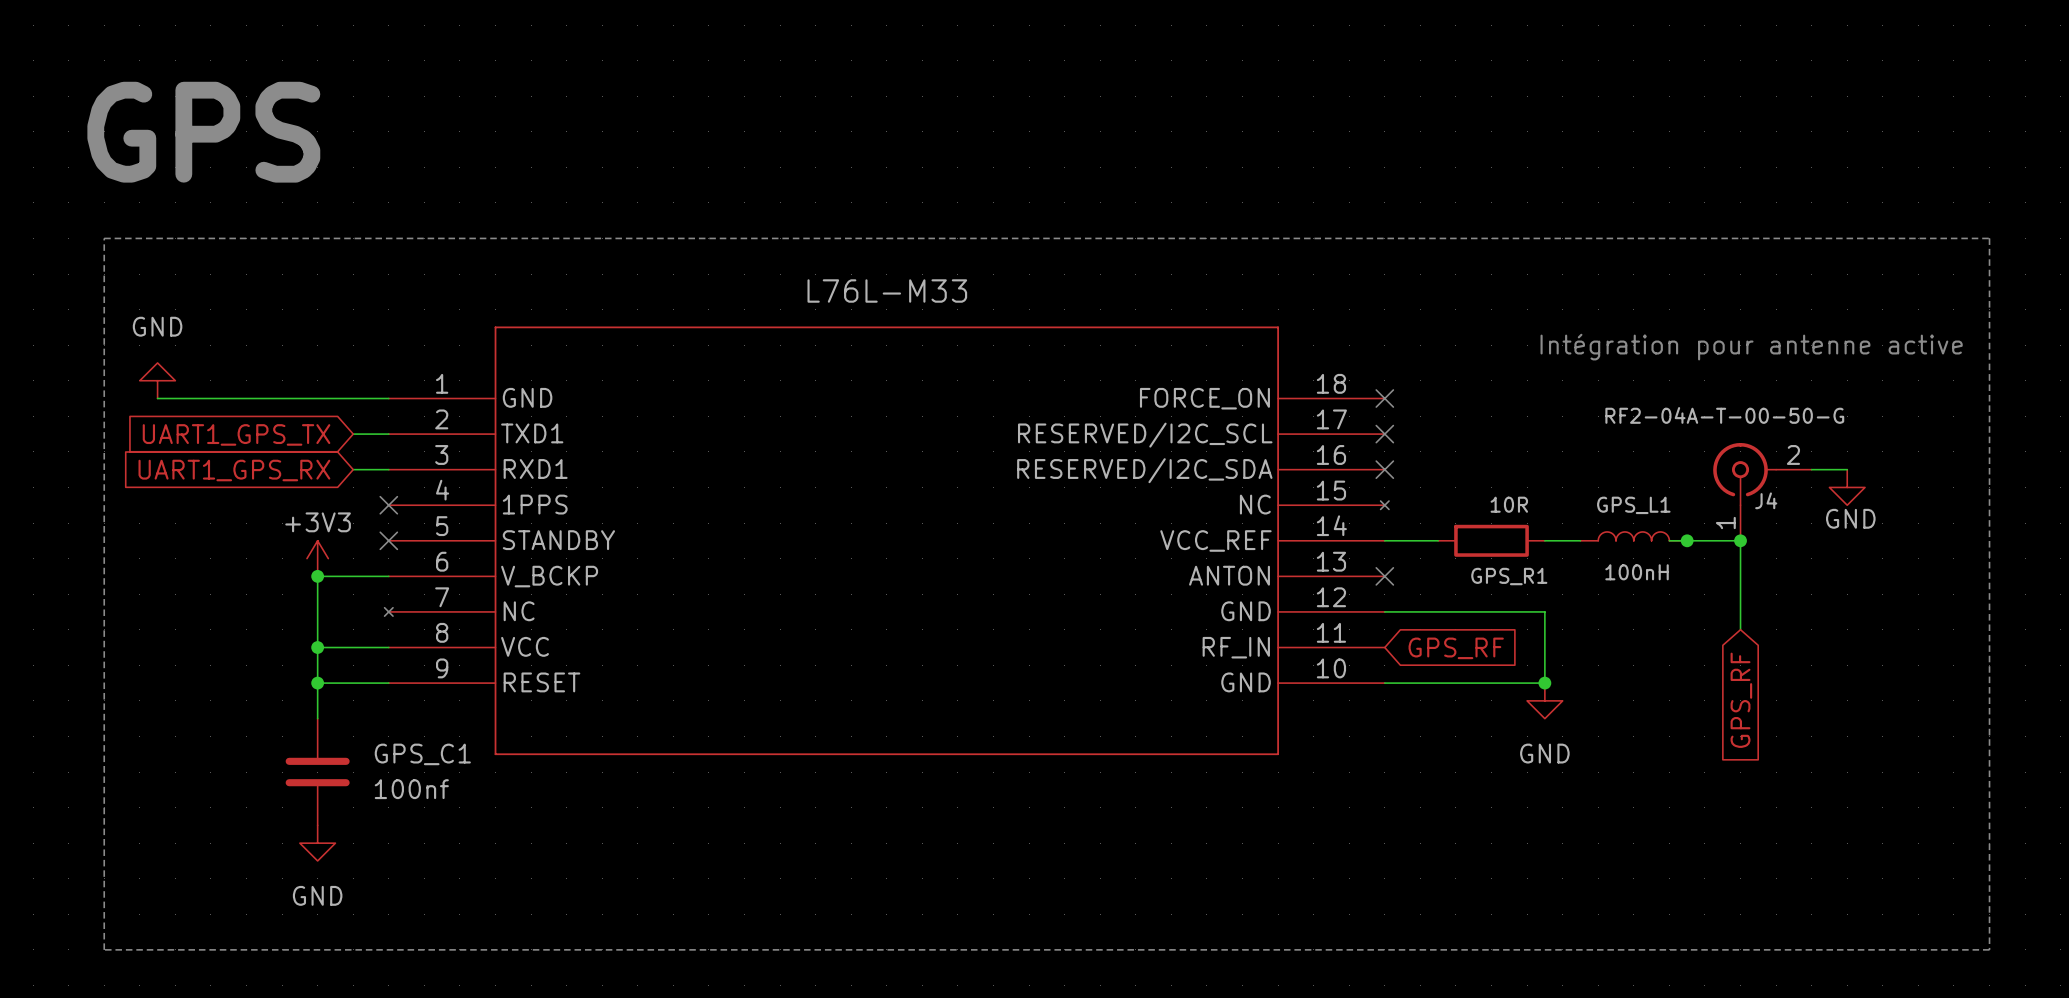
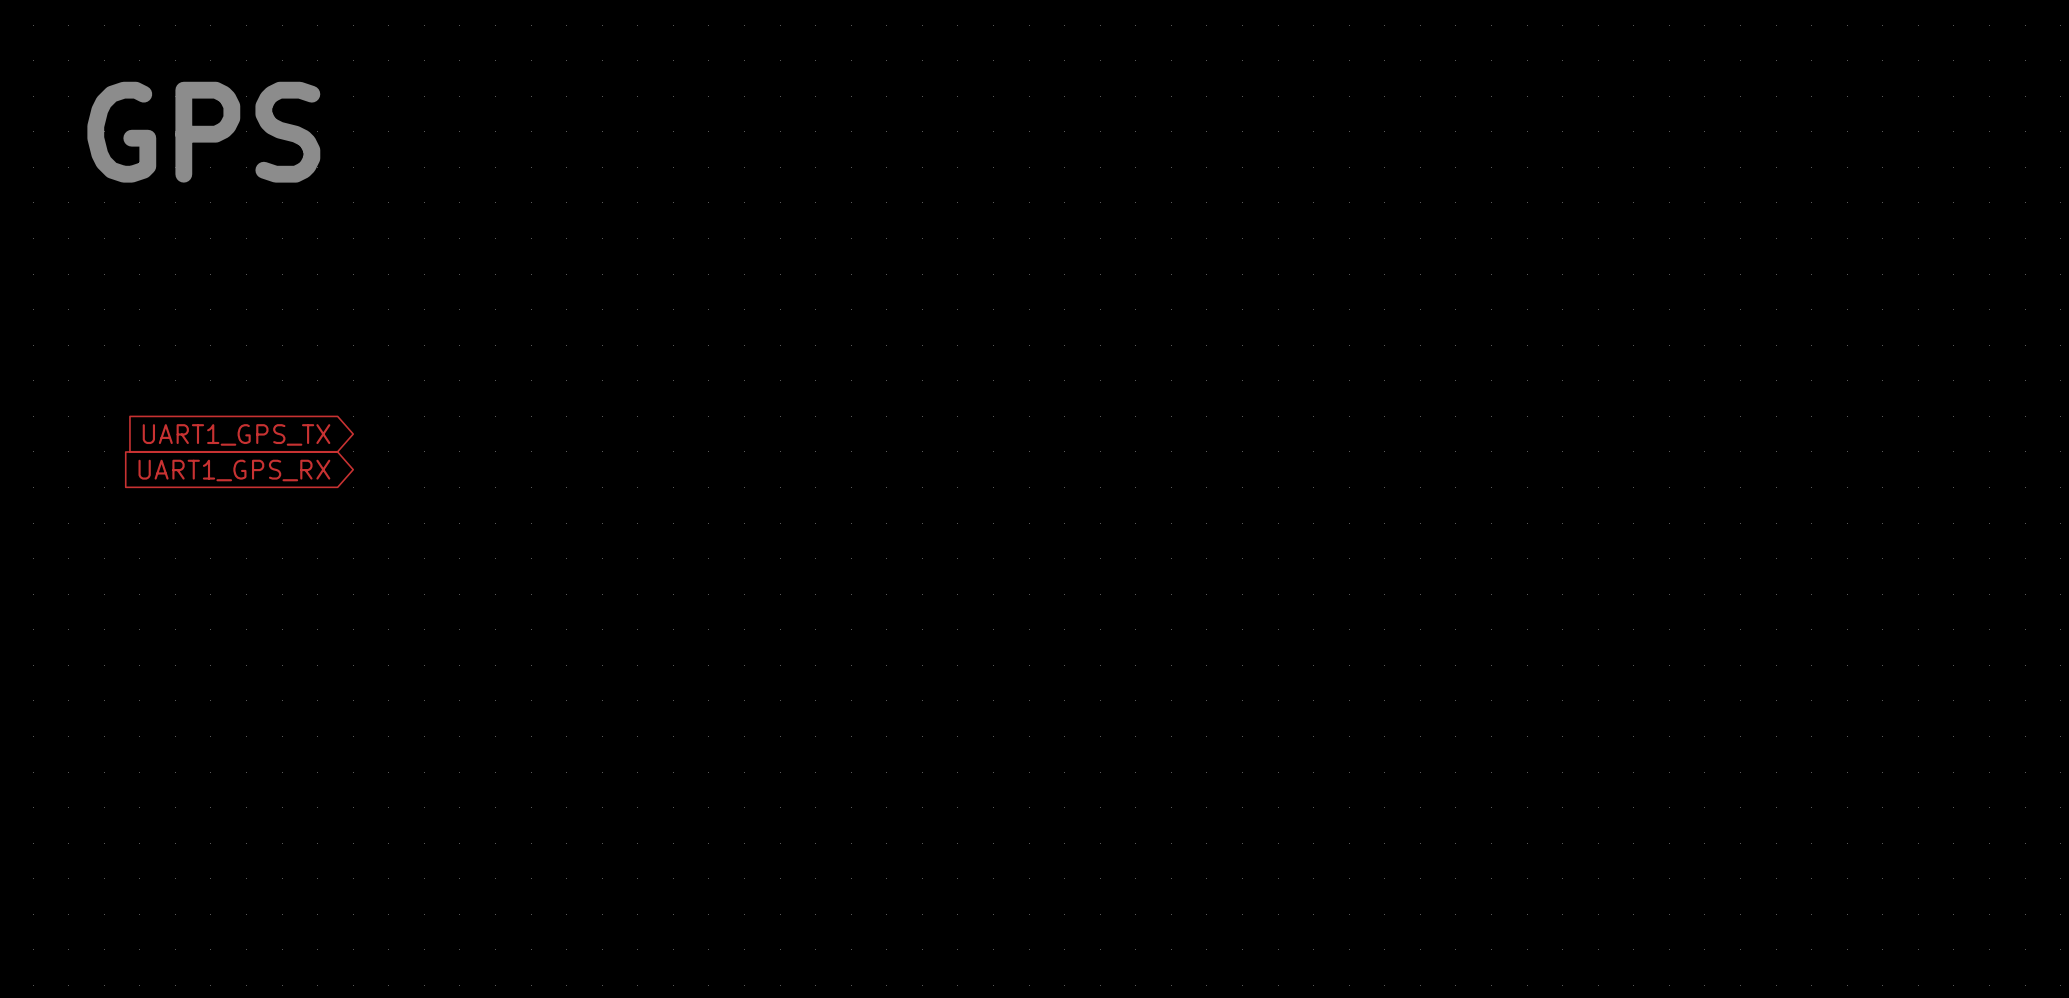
line: (104, 238) (1989, 238) (1989, 949) (104, 949) (104, 238) -> none
text: Intégration pour antenne active (1751, 347) -> none
power symbol: GND (157, 380) -> none
wire: (157, 398) (388, 398) -> none
no-connect mark: (1384, 398) -> none
wire: (353, 434) (388, 434) -> none
no-connect mark: (1384, 434) -> none
wire: (353, 469) (388, 469) -> none
no-connect mark: (1384, 469) -> none
wire: (1811, 469) (1847, 469) -> none
power symbol: GND (1847, 487) -> none
J4: RF2-04A-T-00-50-G (1762, 491) -> none
no-connect mark: (388, 505) -> none
GPS_L1: 100nH (1633, 536) -> none
no-connect mark: (388, 540) -> none
part: L76L-M33 (886, 540) -> none
wire: (1384, 540) (1438, 540) -> none
GPS_R1: 10R (1491, 540) -> none
wire: (1544, 540) (1580, 540) -> none
wire: (1669, 540) (1740, 540) (1740, 629) -> none
junction: (1687, 540) -> none
junction: (1740, 540) -> none
power symbol: +3V3 (317, 558) -> none
junction: (317, 576) -> none
wire: (388, 576) (317, 576) (317, 718) -> none
no-connect mark: (1384, 576) -> none
wire: (1384, 611) (1544, 611) (1544, 683) (1384, 683) -> none
wire: (317, 647) (388, 647) -> none
junction: (317, 647) -> none
global label: GPS_RF (1456, 648) -> none
wire: (317, 683) (388, 683) -> none
junction: (317, 683) -> none
junction: (1544, 683) -> none
power symbol: GND (1544, 700) -> none
global label: GPS_RF (1741, 700) -> none
GPS_C1: 100nf (317, 772) -> none
power symbol: GND (317, 843) -> none

